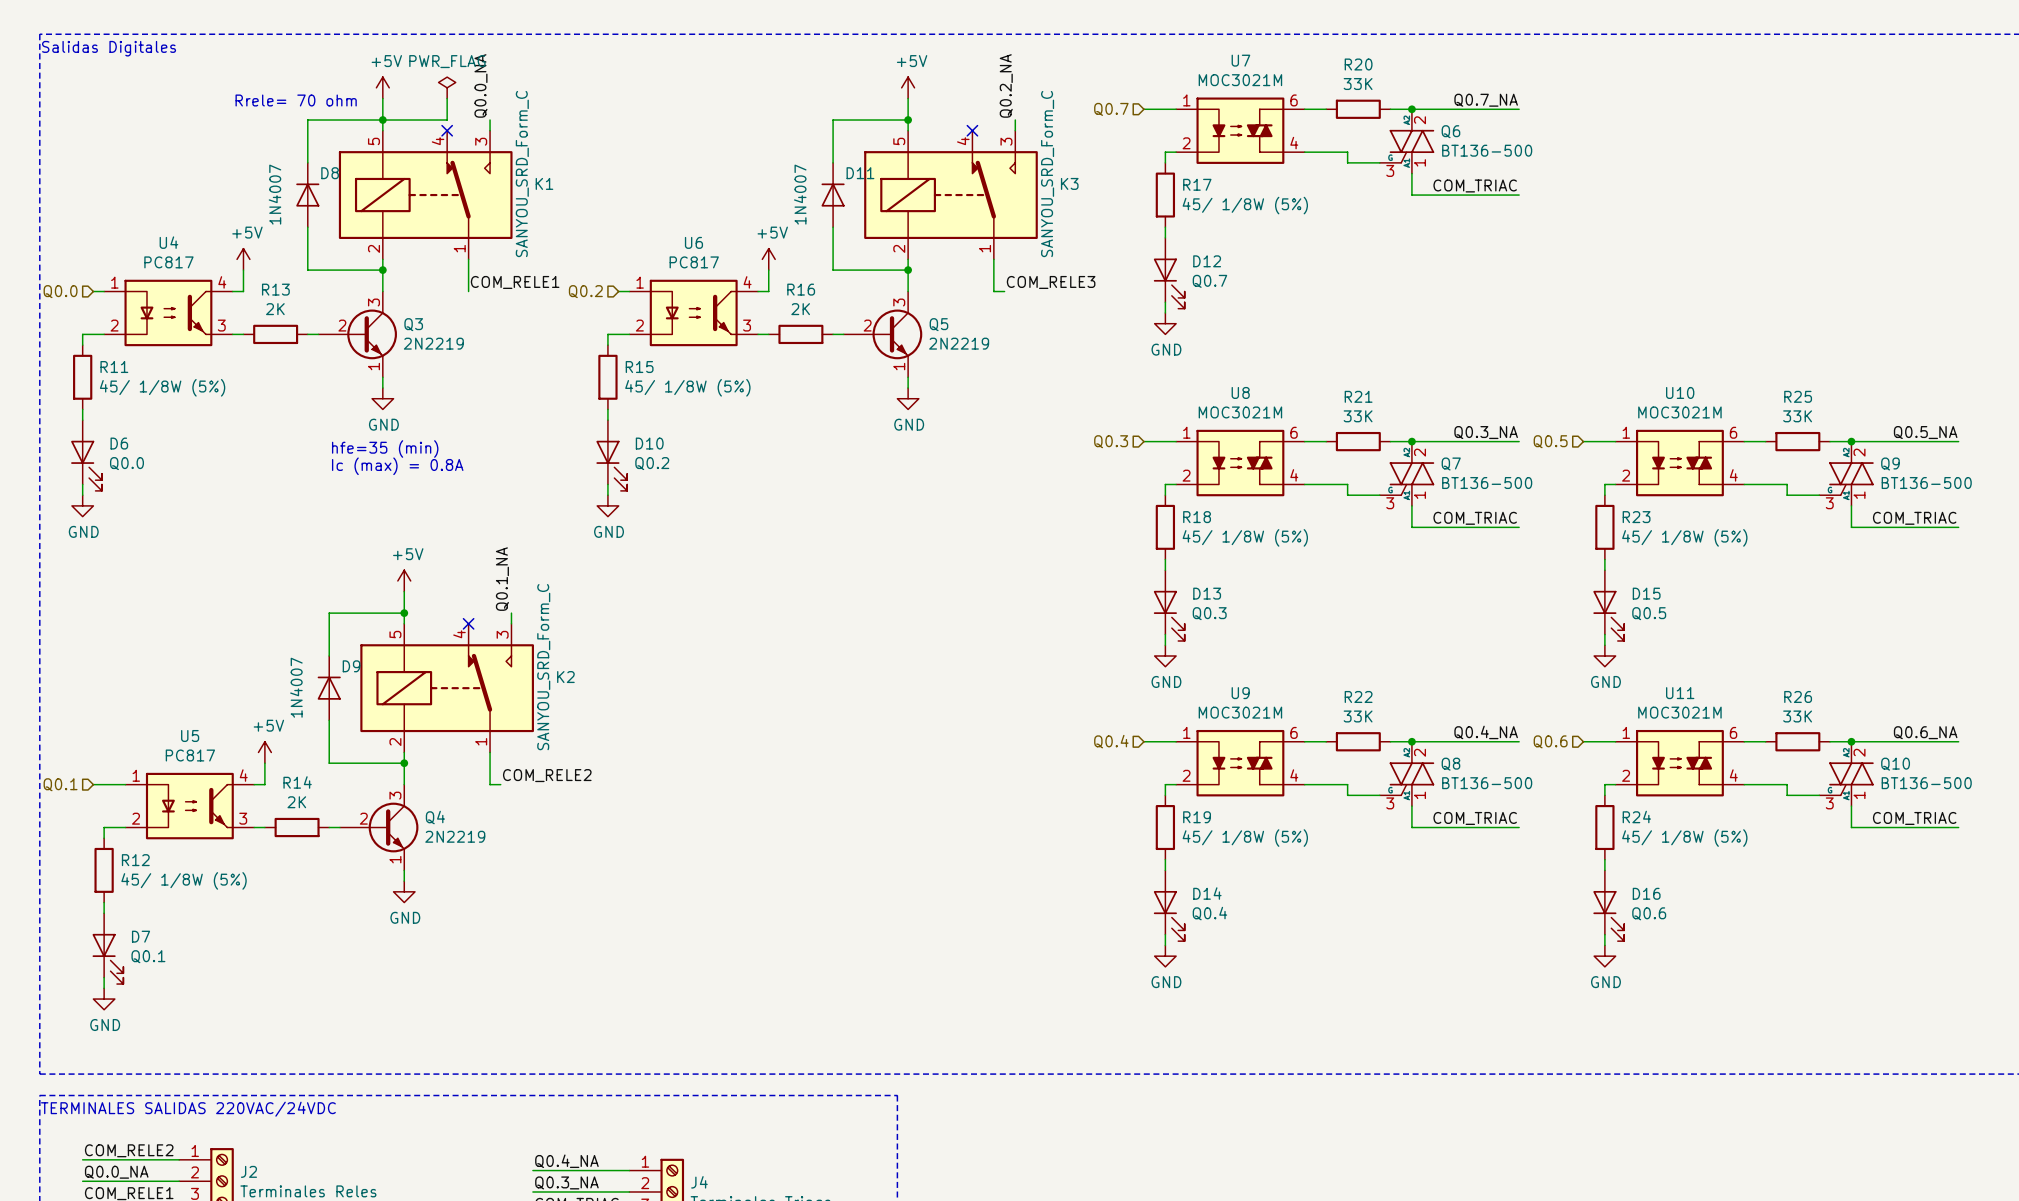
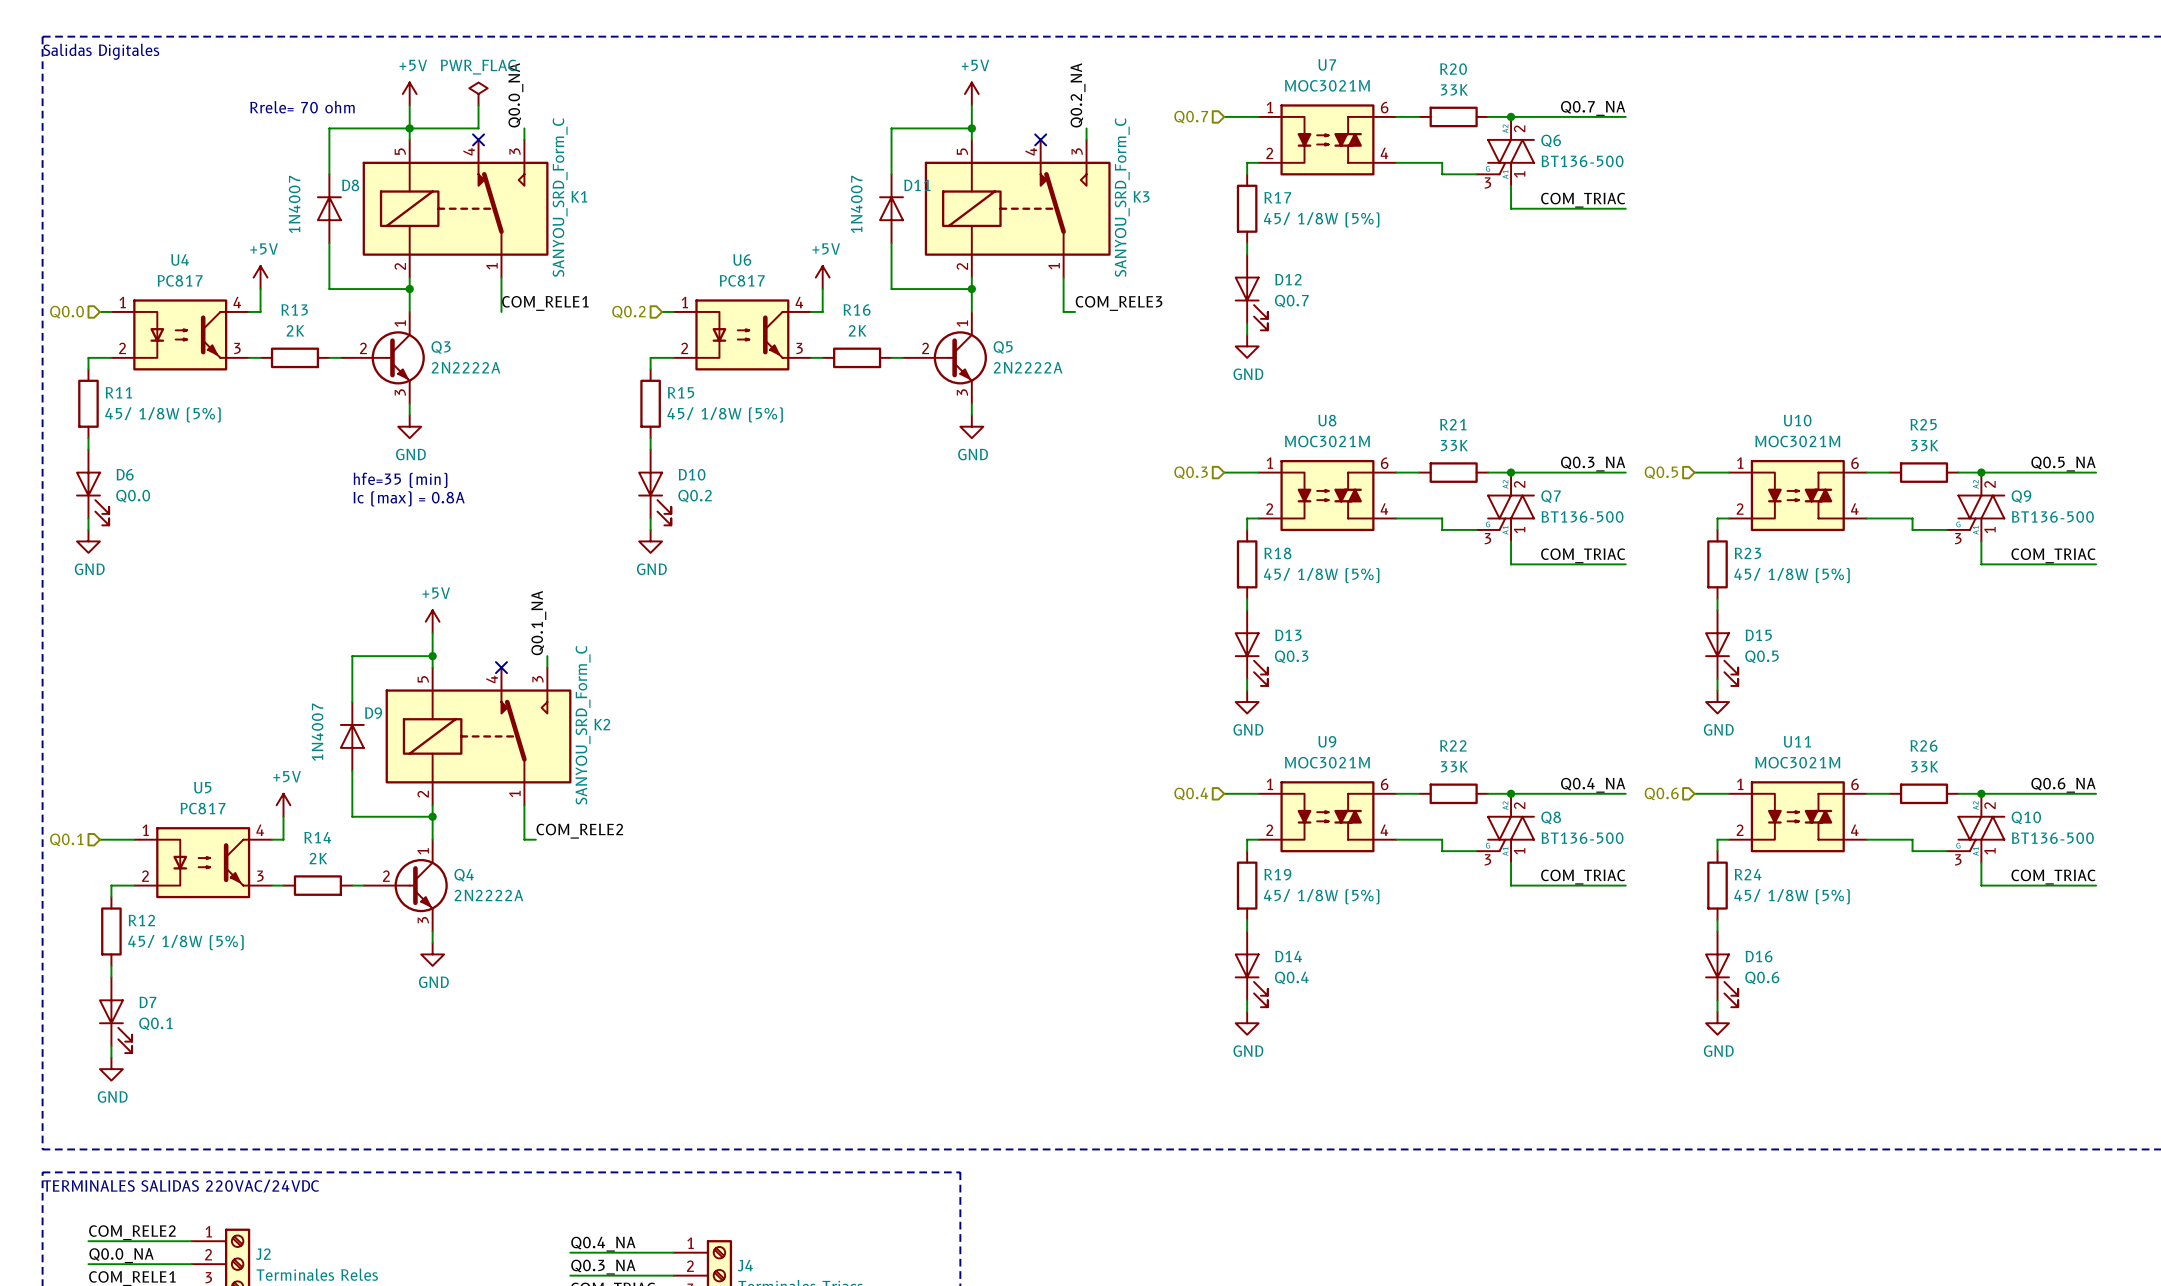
Q3 symbol: [318, 291, 397, 378] -> [340, 311, 425, 404]
Q5 symbol: [843, 291, 923, 378] -> [902, 311, 987, 404]
Q3 value: 2N2219 (433, 343) -> 2N2222A (466, 367)
Q5 value: 2N2219 (959, 343) -> 2N2222A (1028, 367)
Q4 symbol: [339, 784, 419, 871] -> [363, 839, 448, 932]
Q4 value: 2N2219 (455, 836) -> 2N2222A (488, 895)

